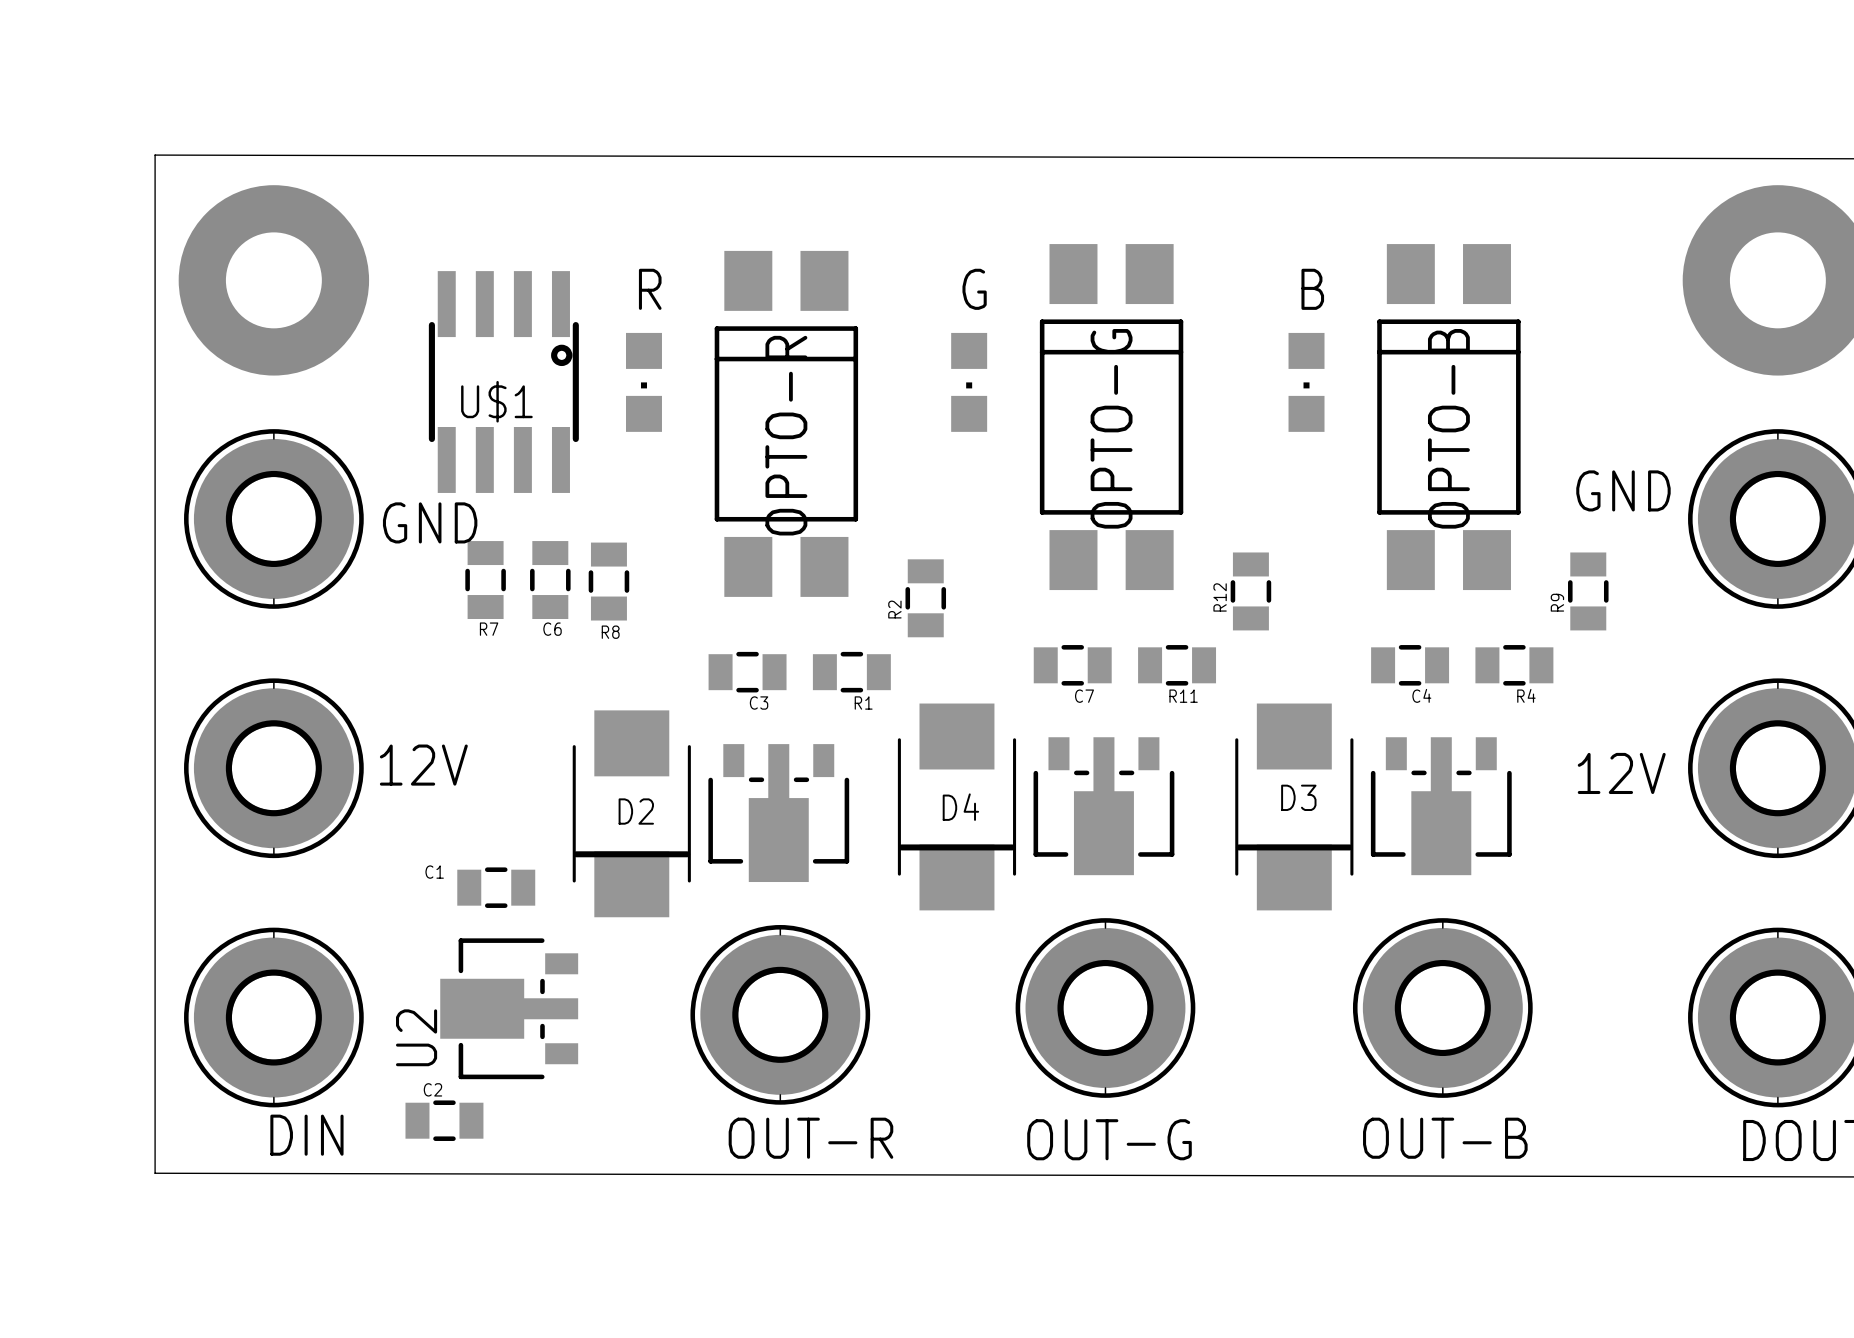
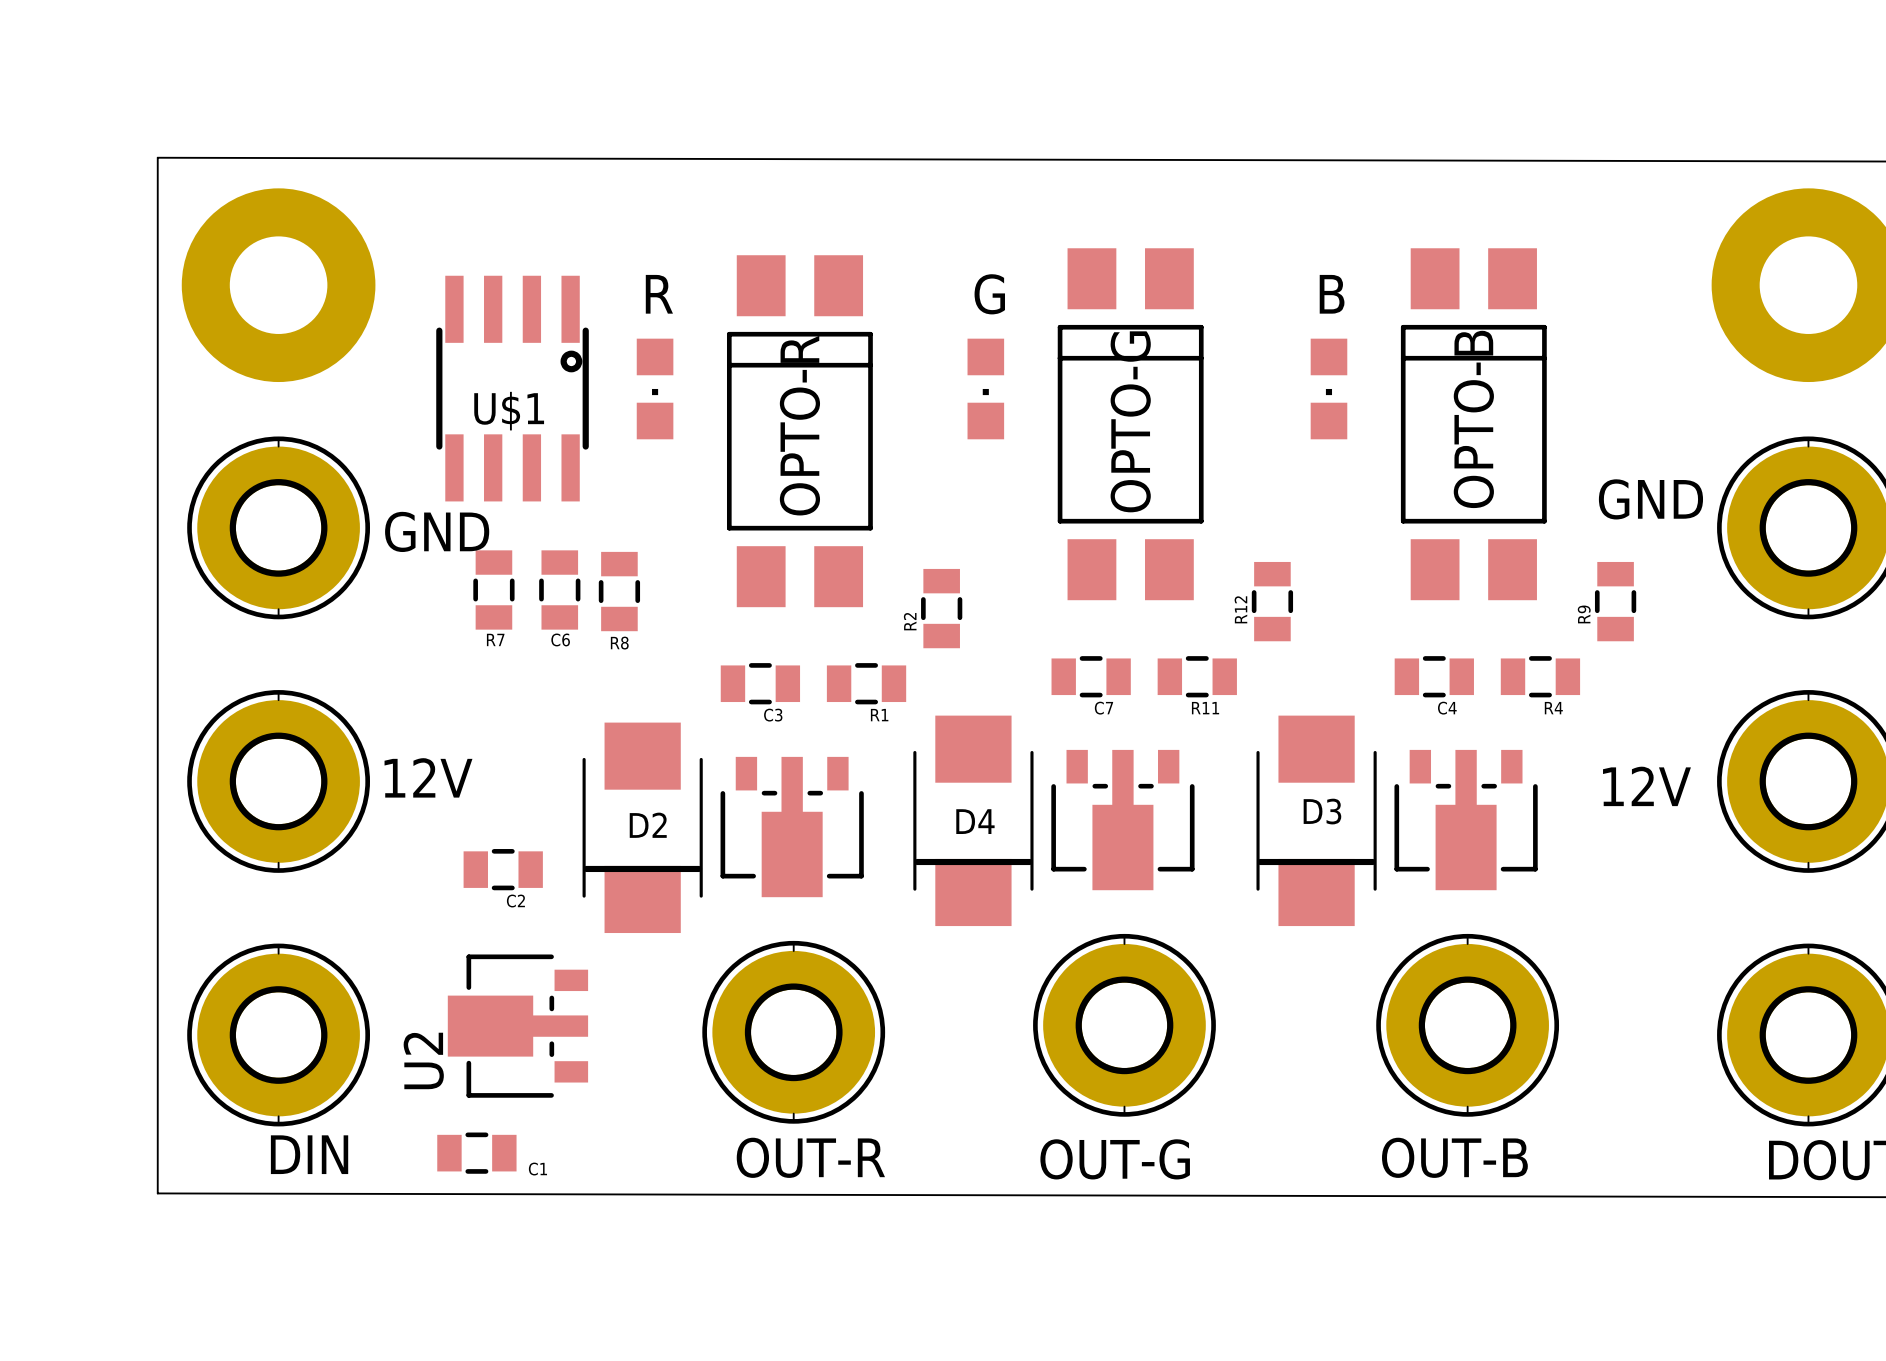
C1 name position: C1 (434, 872) -> C1 (537, 1169)
C1 position: (496, 887) -> (476, 1153)
C2 name position: C2 (432, 1089) -> C2 (515, 901)
C2 position: (444, 1120) -> (503, 869)

